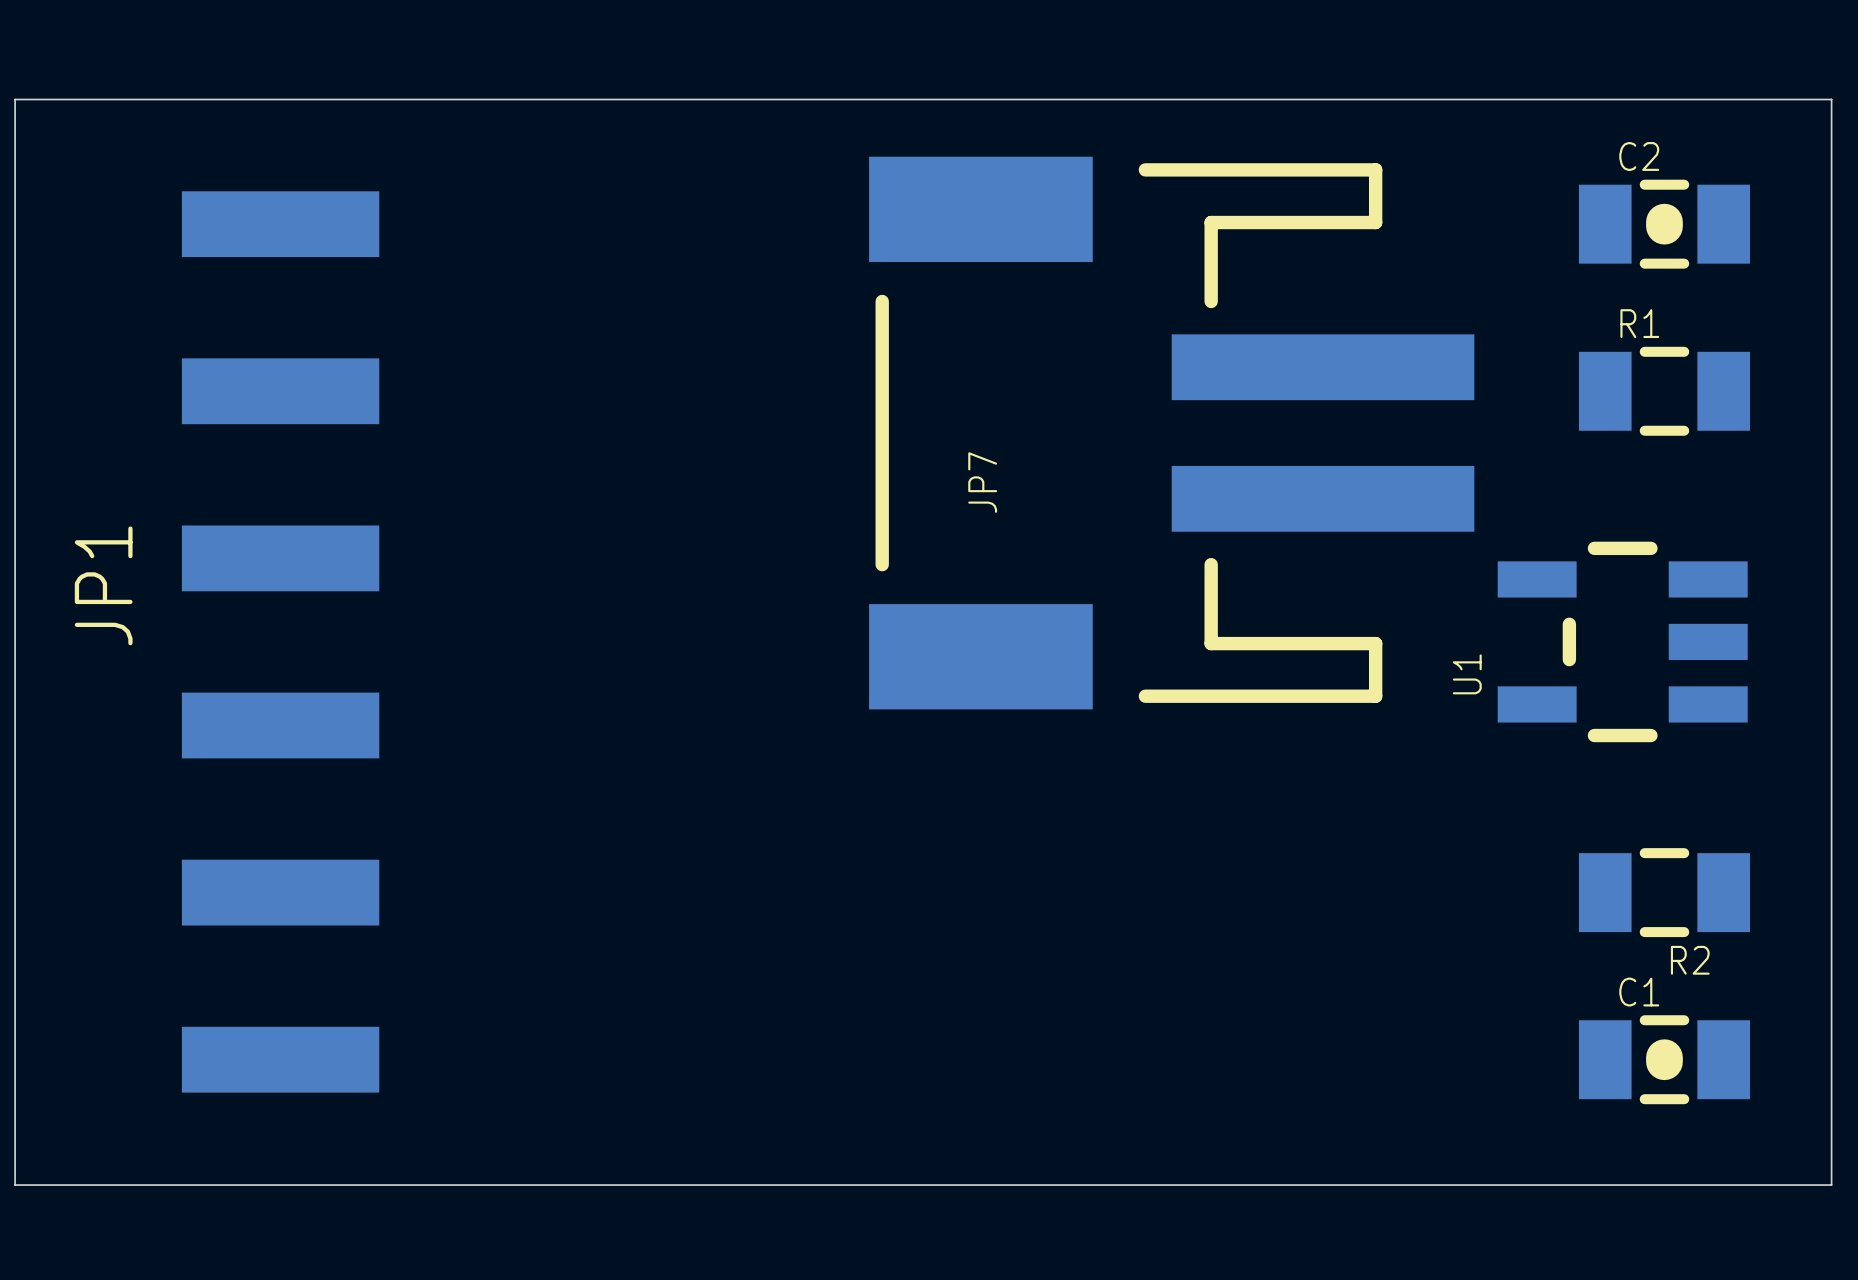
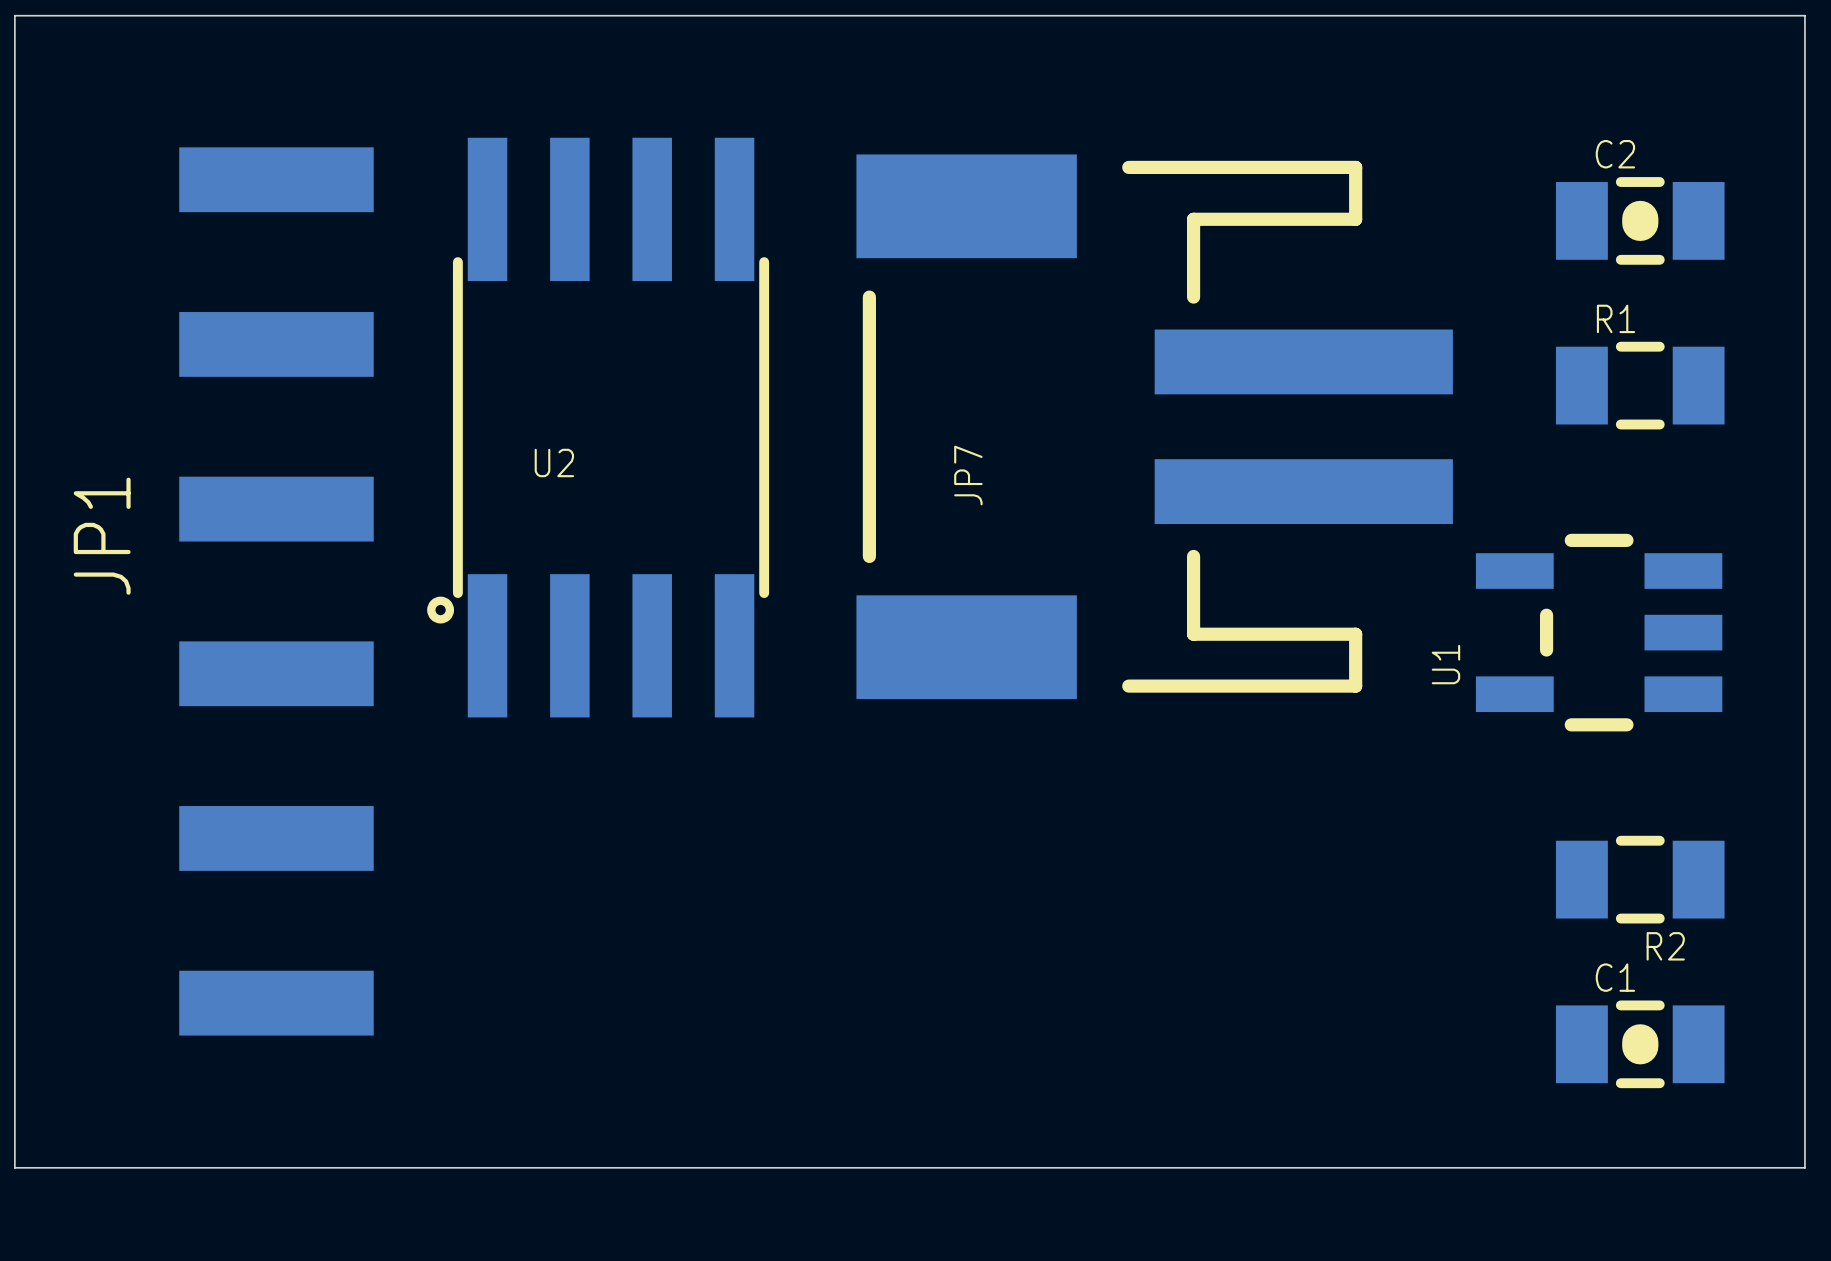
board edge: (1831, 99) (15, 99) -> (1804, 98) (1804, 15) (14, 15) (14, 98)
U2: none -> (598, 427)
JP1 position: (280, 641) -> (276, 591)

